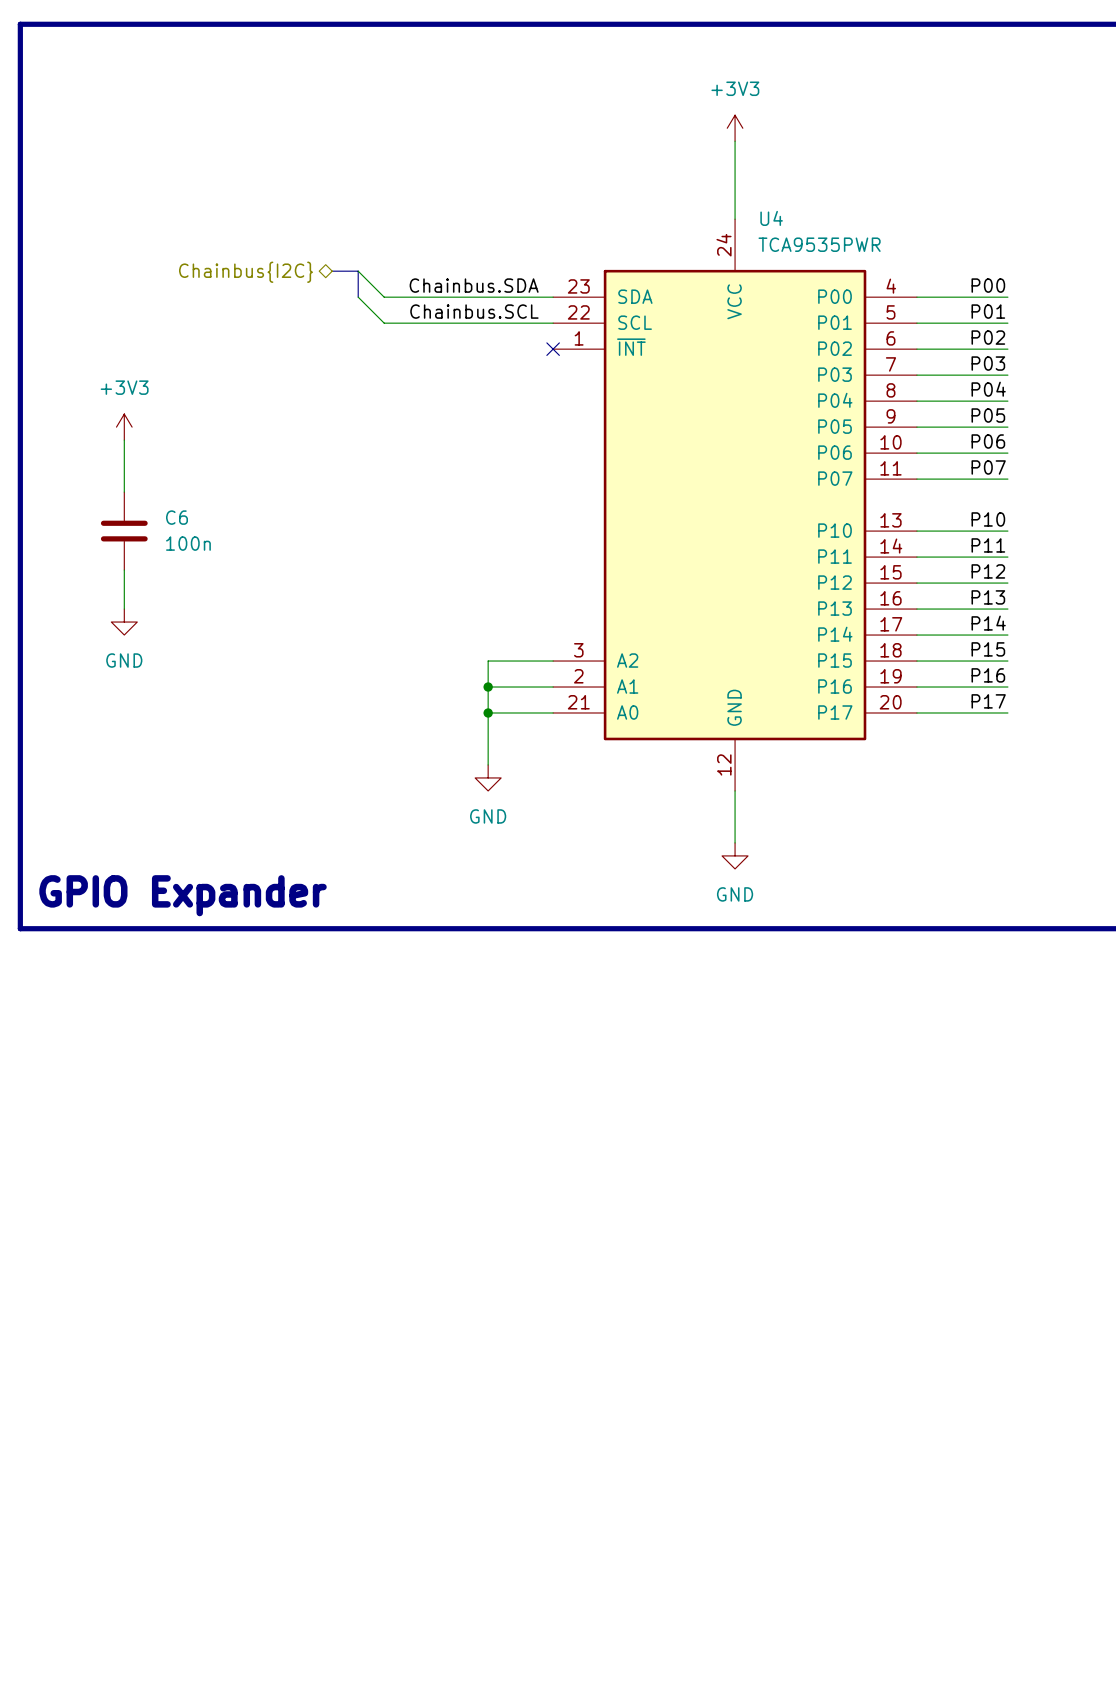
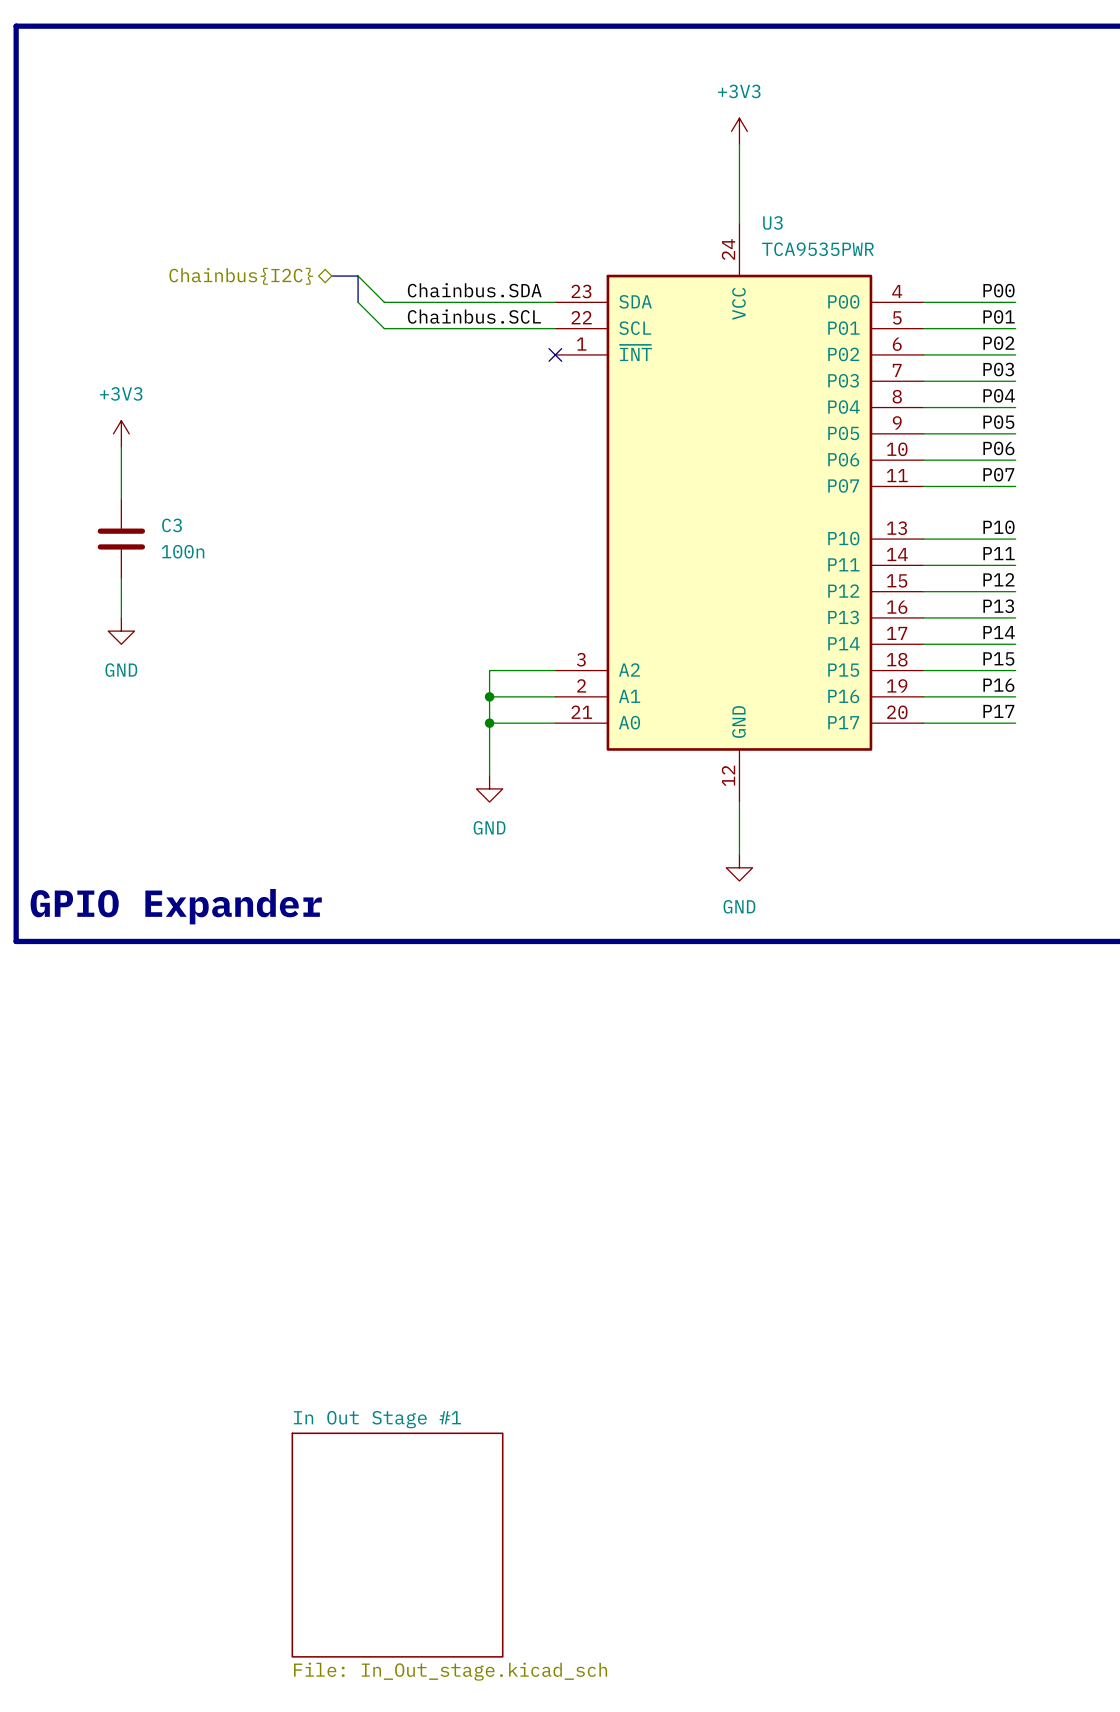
U4 name: U4 (771, 218) -> U3 (772, 222)
C6 name: C6 (177, 517) -> C3 (172, 525)
sheet In Out Stage #1: none -> File: In_Out_stage.kicad_sch (397, 1545)

